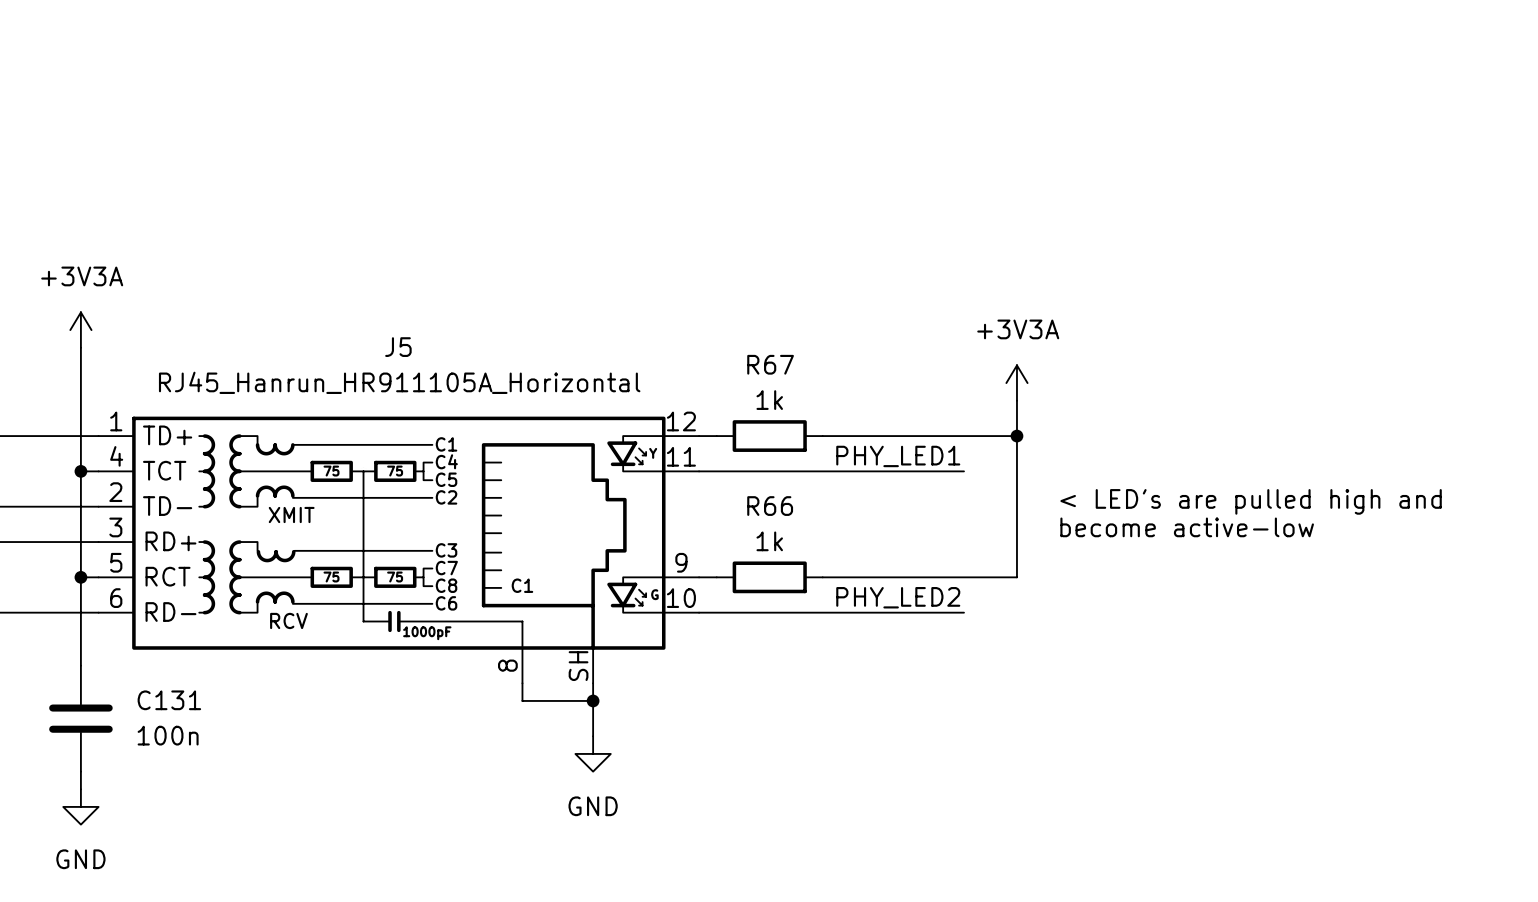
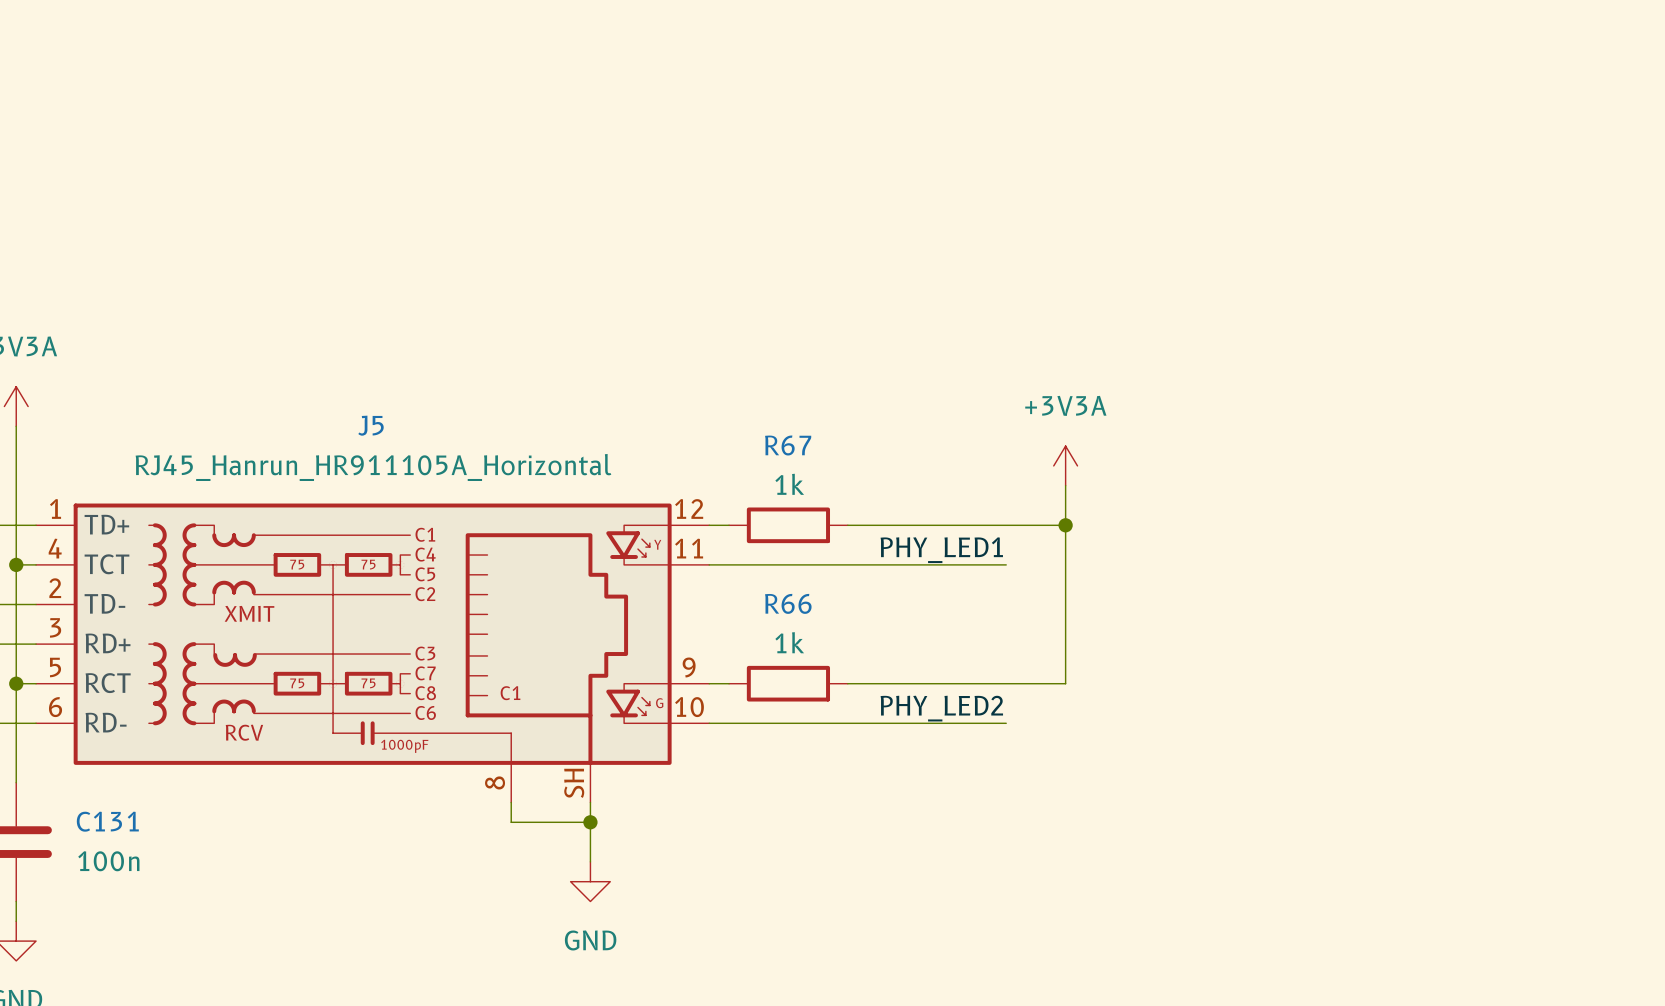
text: < LED's are pulled high and (1251, 501) -> none
text: become active-low (1187, 527) -> none

